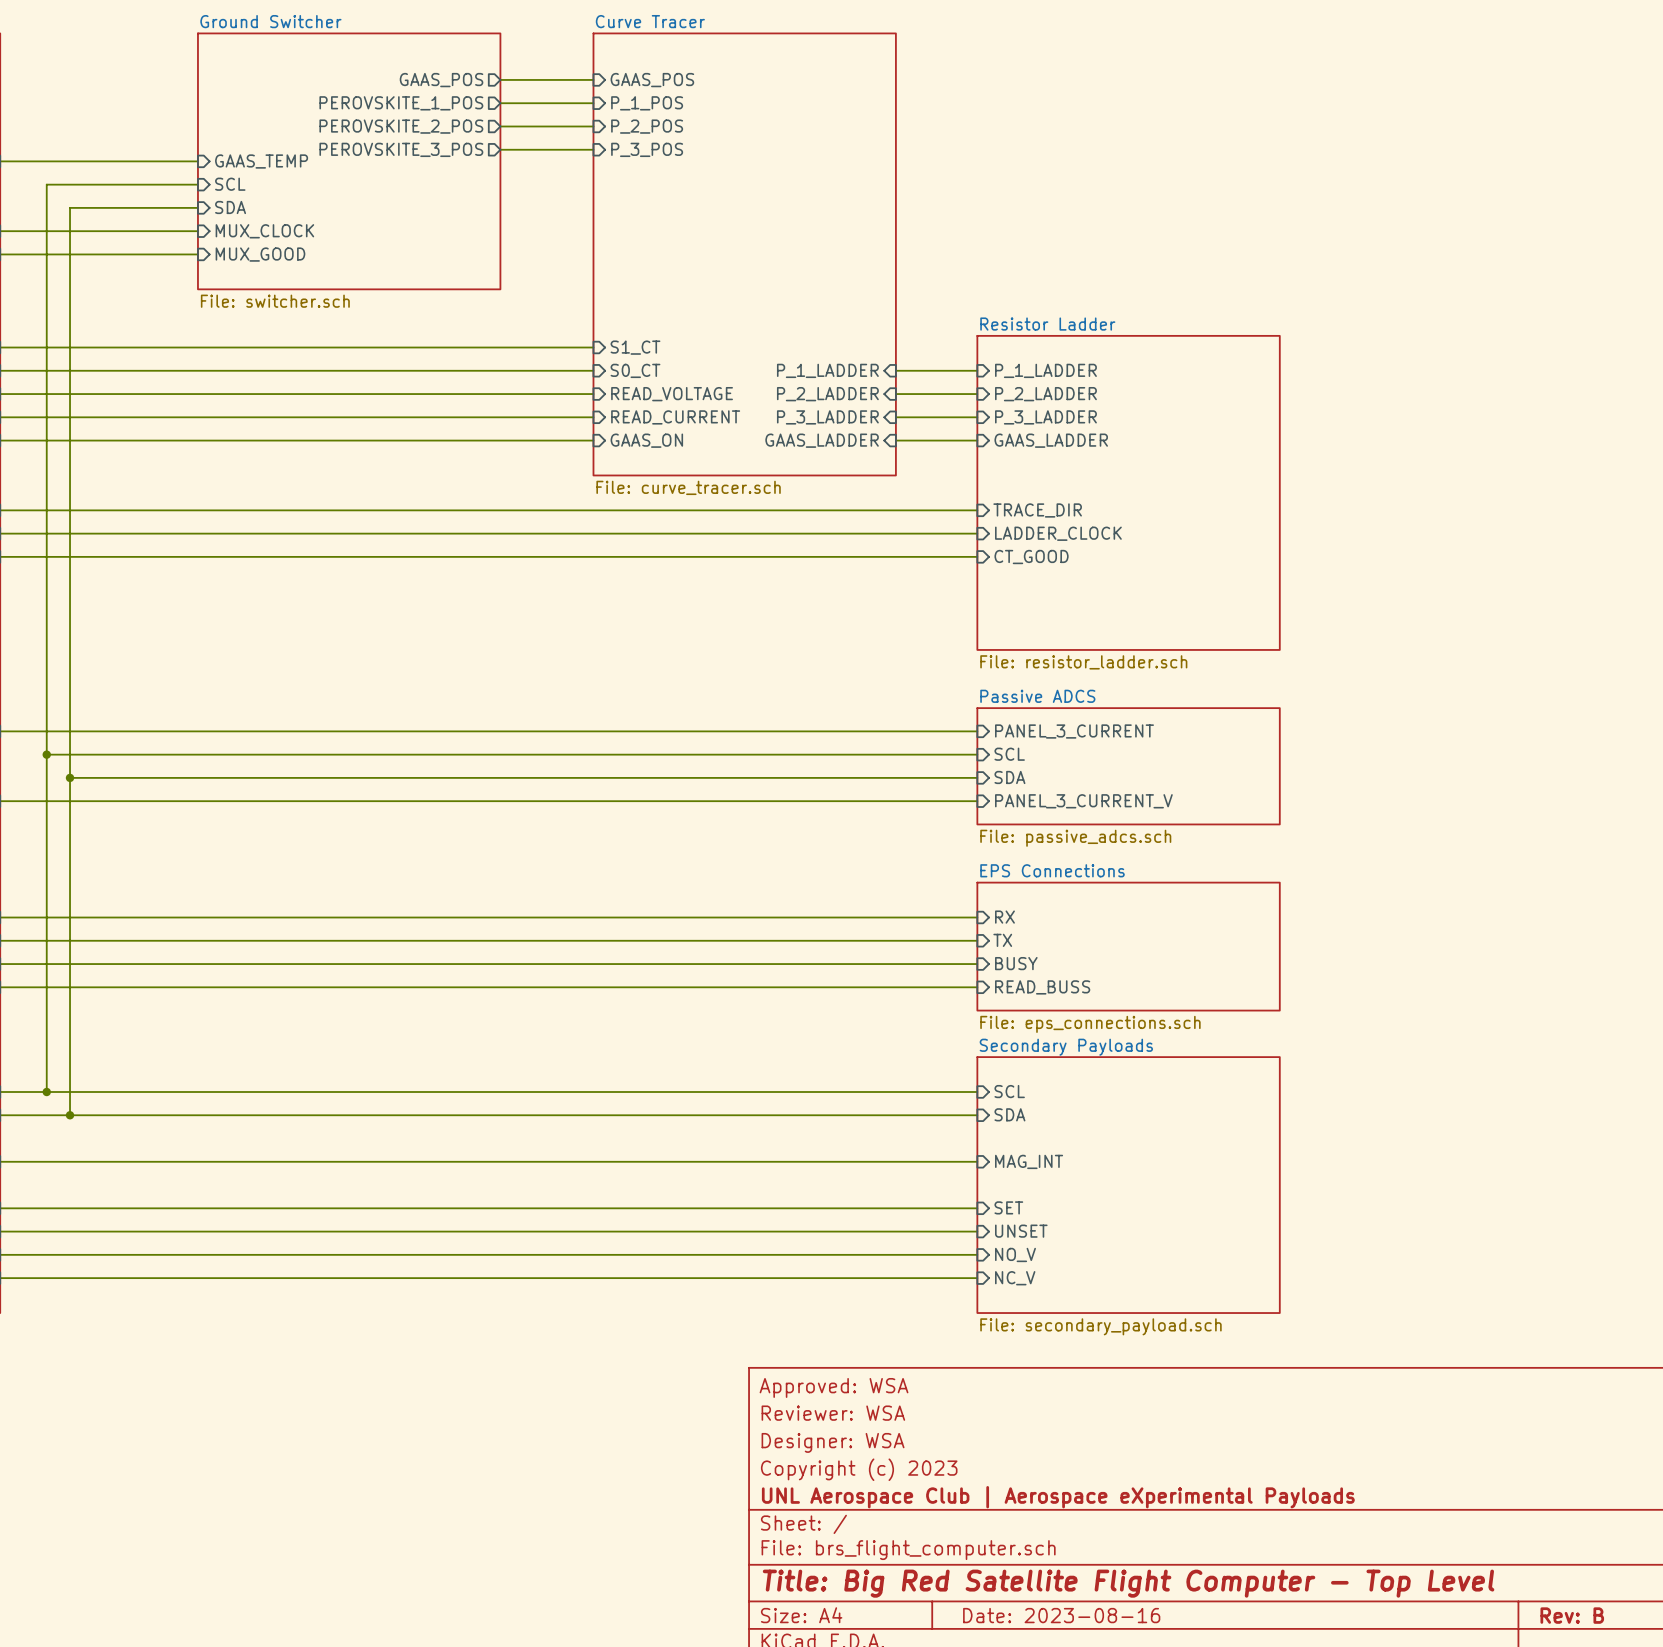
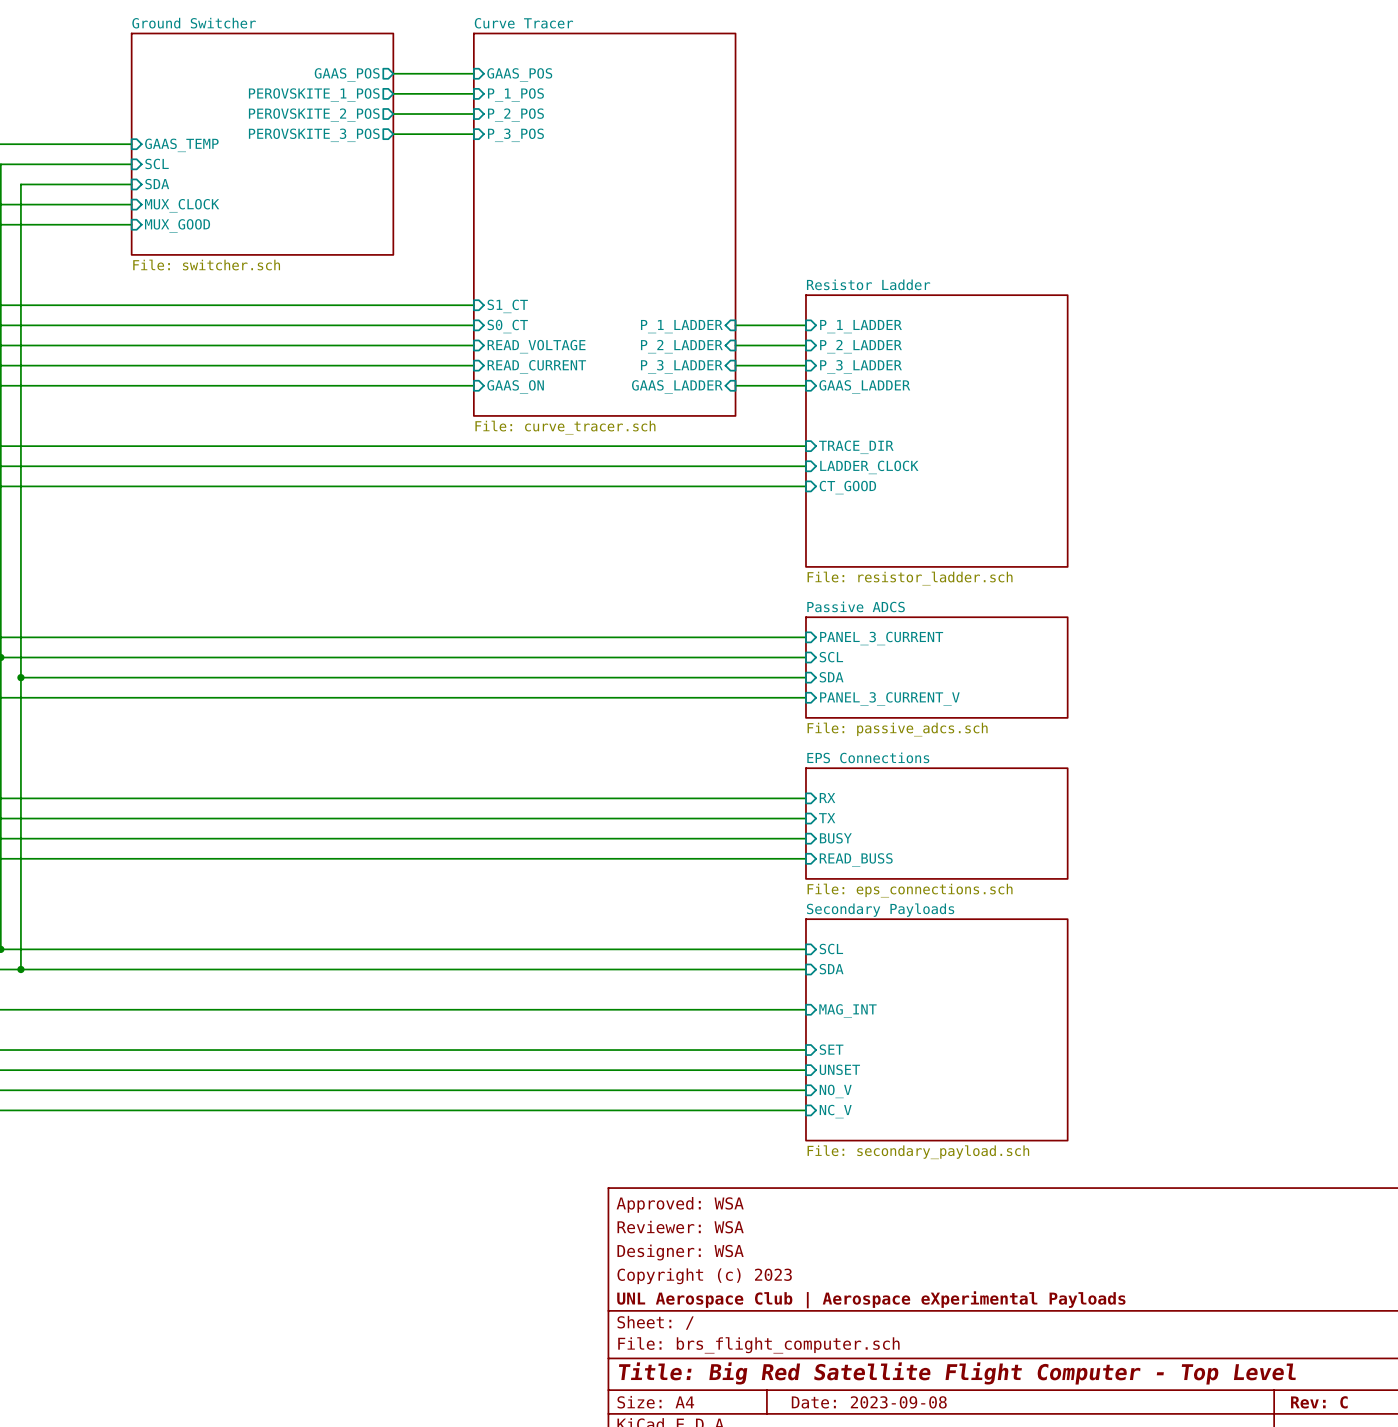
title block: Date: 2023-08-16 (1061, 1615) -> Date: 2023-09-08 (869, 1402)
title block: Rev: B (1572, 1615) -> Rev: C (1319, 1402)

